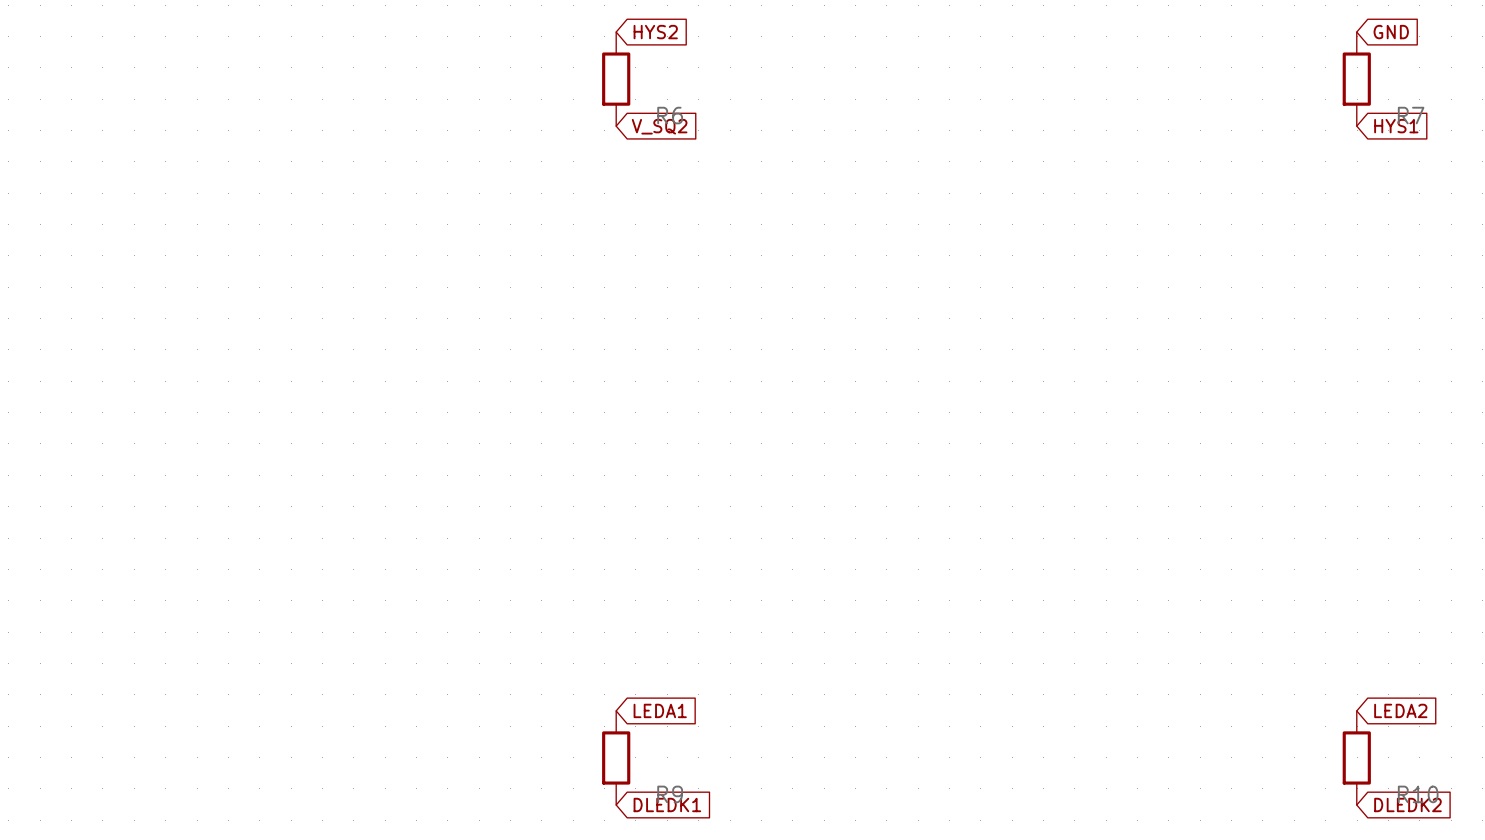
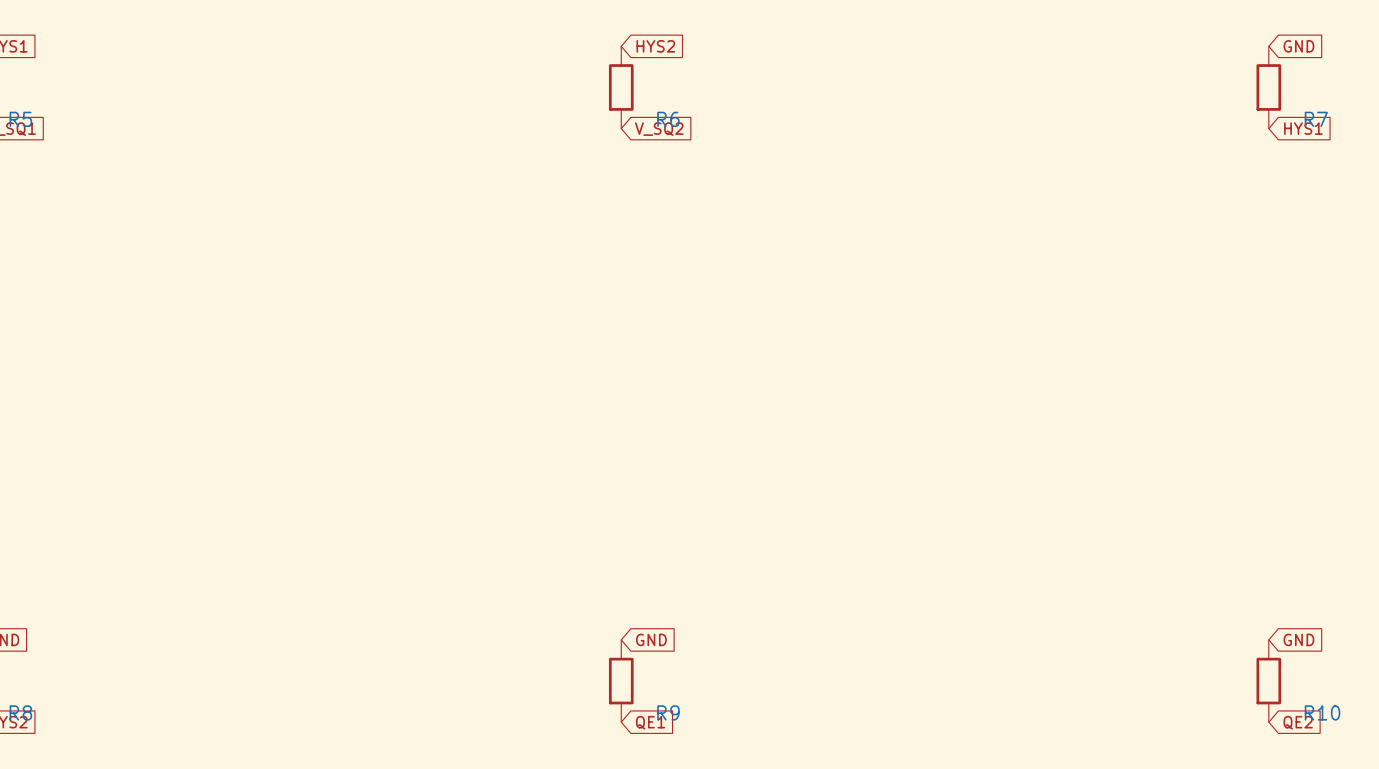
global label: LEDA1 (660, 710) -> GND (651, 639)
global label: LEDA2 (1400, 710) -> GND (1298, 639)
global label: DLEDK1 (667, 805) -> QE1 (650, 722)
global label: DLEDK2 (1407, 805) -> QE2 (1298, 722)

